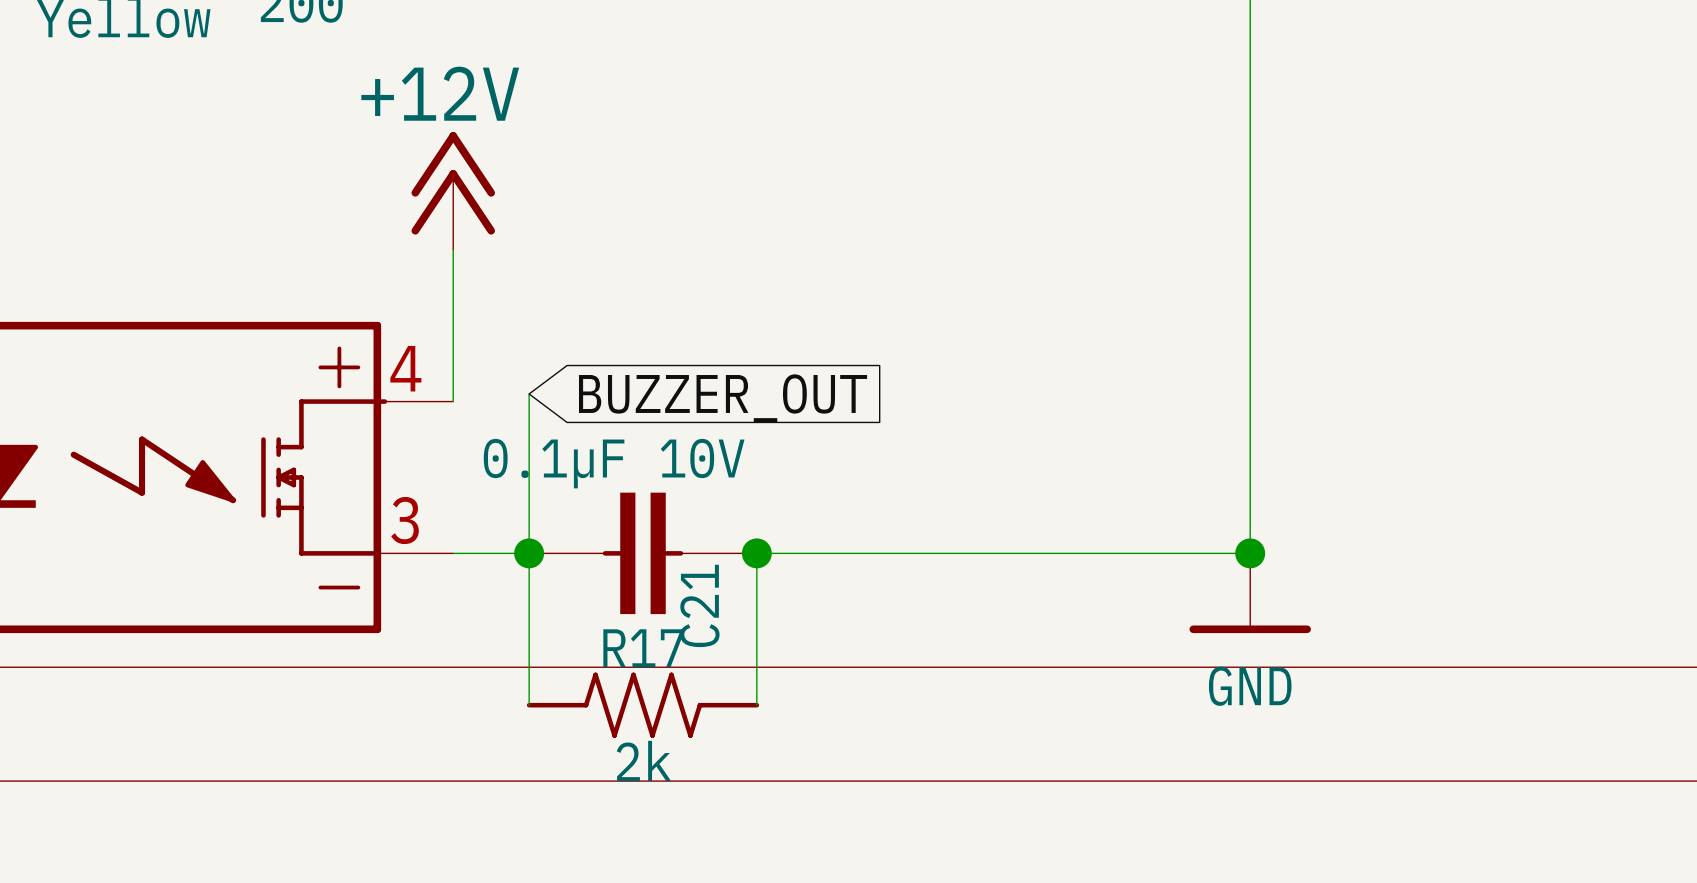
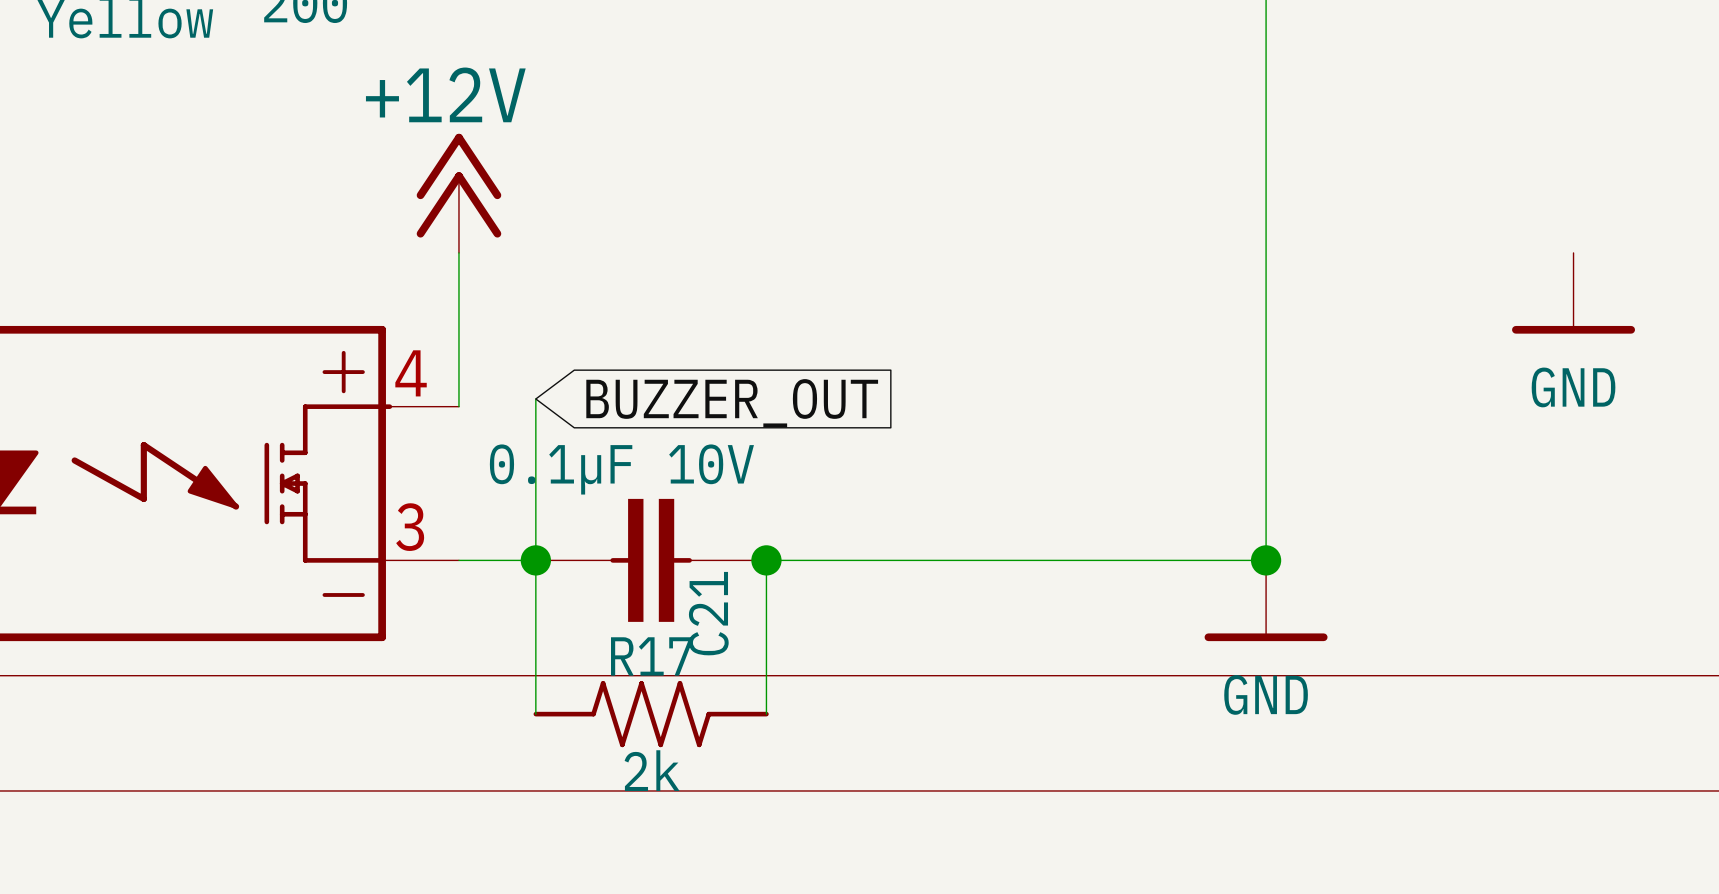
power symbol: none -> GND (1573, 293)

